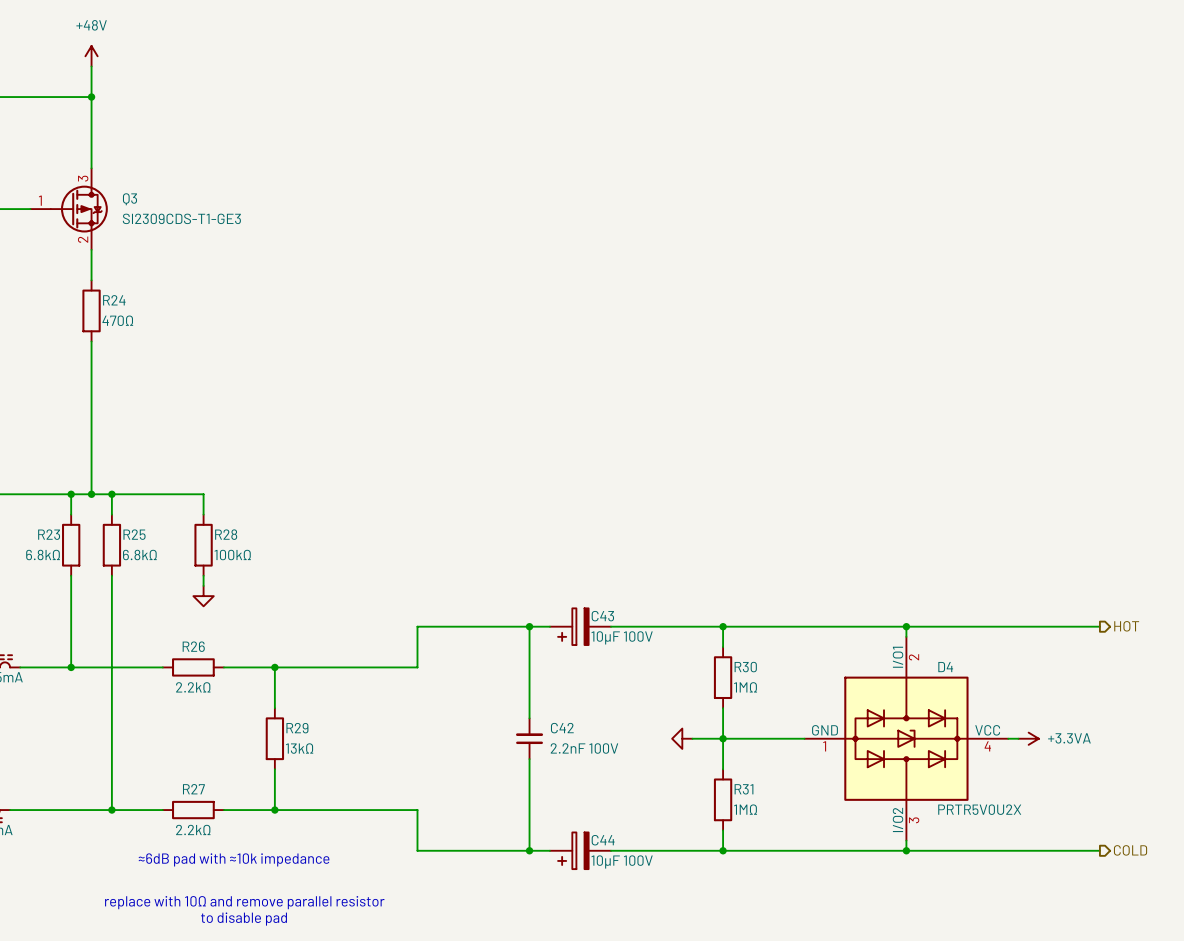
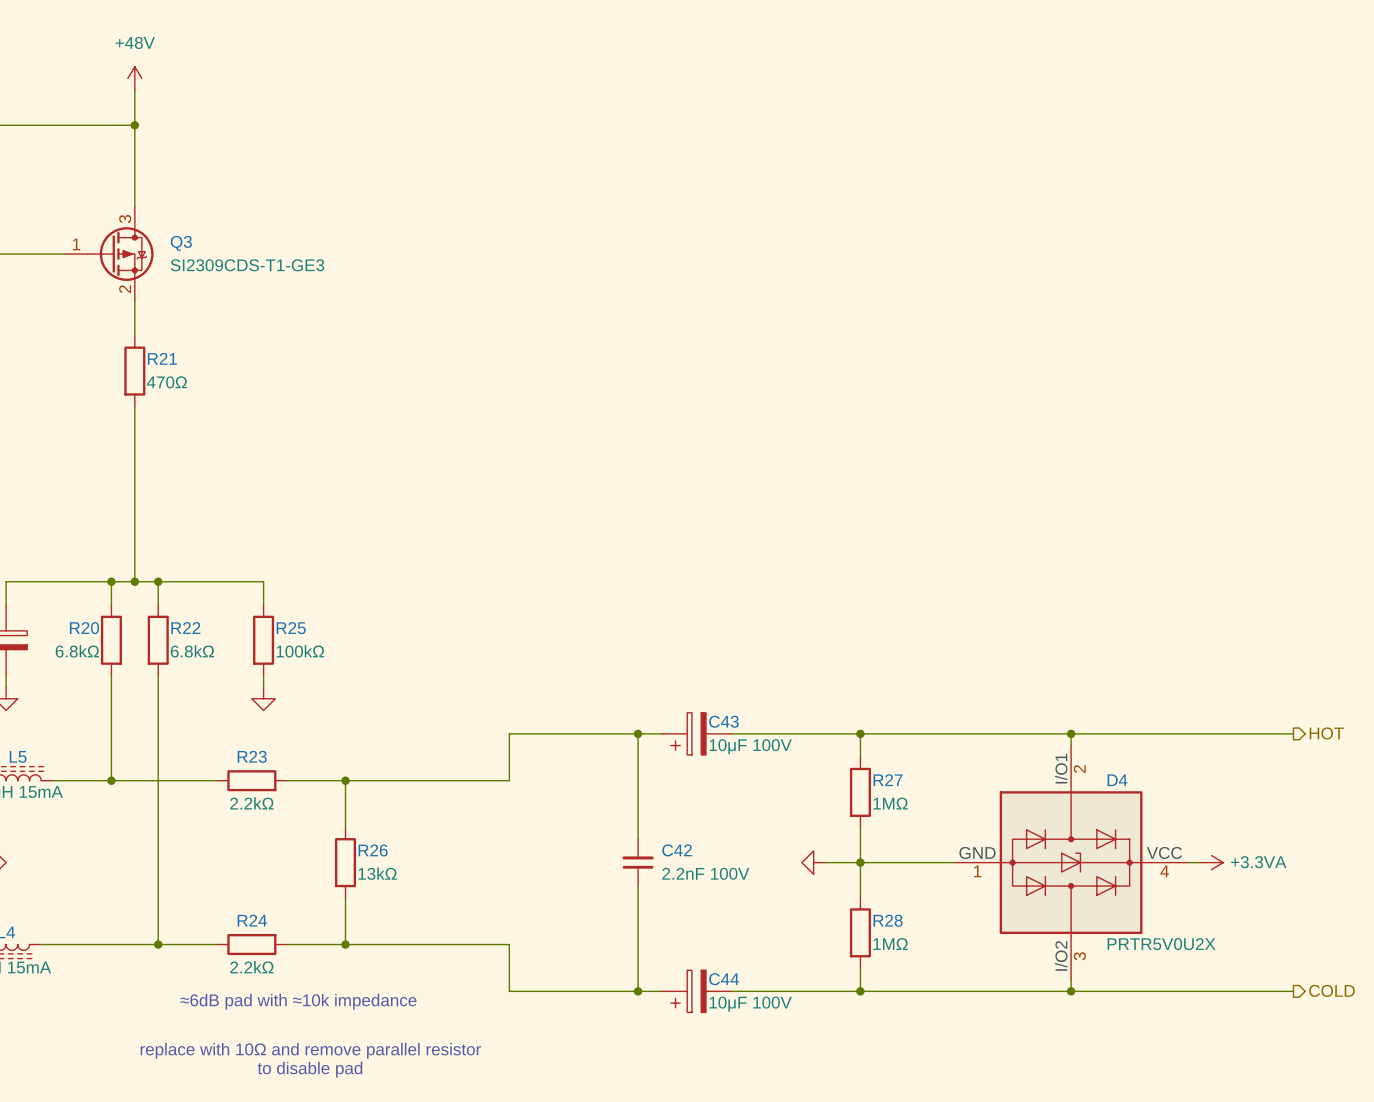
R24 name: R24 (114, 300) -> R21 (162, 358)
R23 name: R23 (49, 534) -> R20 (84, 628)
R25 name: R25 (134, 534) -> R22 (185, 628)
R28 name: R28 (226, 534) -> R25 (291, 628)
R26 name: R26 (193, 646) -> R23 (252, 756)
R30 name: R30 (745, 667) -> R27 (888, 780)
R29 name: R29 (297, 728) -> R26 (373, 850)
R27 name: R27 (193, 789) -> R24 (252, 920)
R31 name: R31 (744, 789) -> R28 (888, 920)

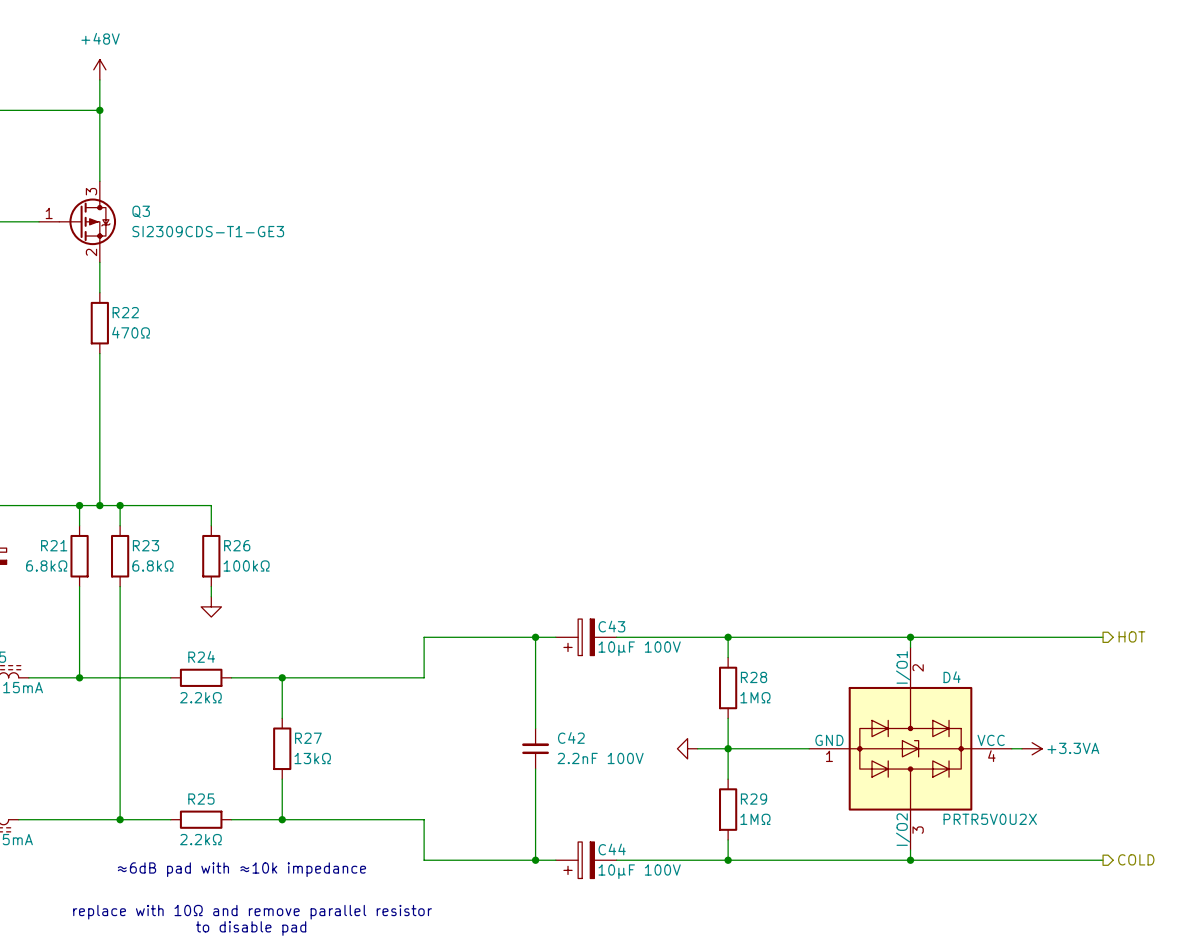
R21 name: R21 (162, 358) -> R22 (125, 312)
R20 name: R20 (84, 628) -> R21 (54, 545)
R22 name: R22 (185, 628) -> R23 (145, 545)
R25 name: R25 (291, 628) -> R26 (237, 545)
R23 name: R23 (252, 756) -> R24 (201, 656)
R27 name: R27 (888, 780) -> R28 (754, 677)
R26 name: R26 (373, 850) -> R27 (308, 738)
R24 name: R24 (252, 920) -> R25 (201, 799)
R28 name: R28 (888, 920) -> R29 (754, 799)

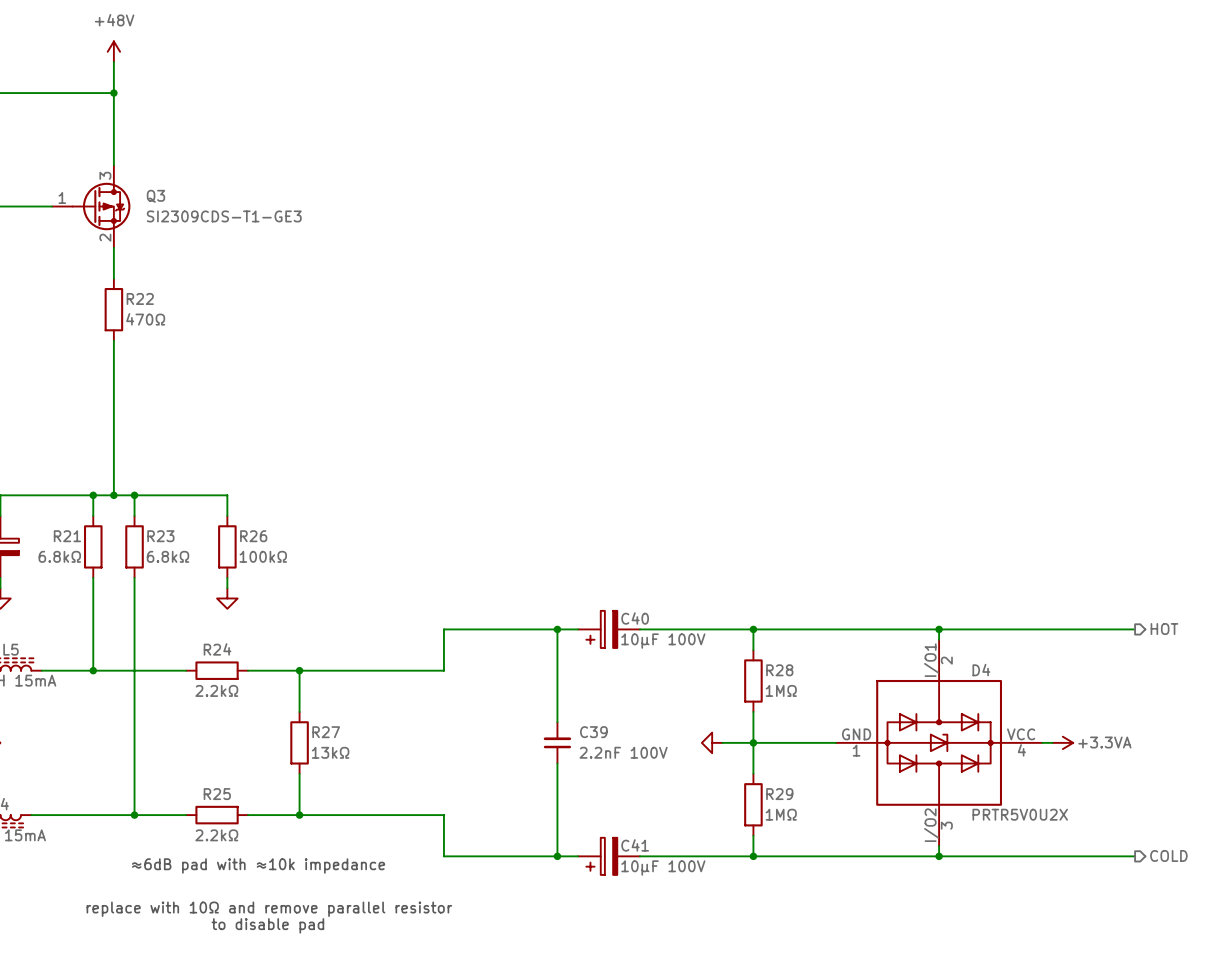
C43 name: C43 (611, 626) -> C40 (635, 618)
C42 name: C42 (571, 737) -> C39 (593, 732)
C44 name: C44 (612, 849) -> C41 (635, 845)

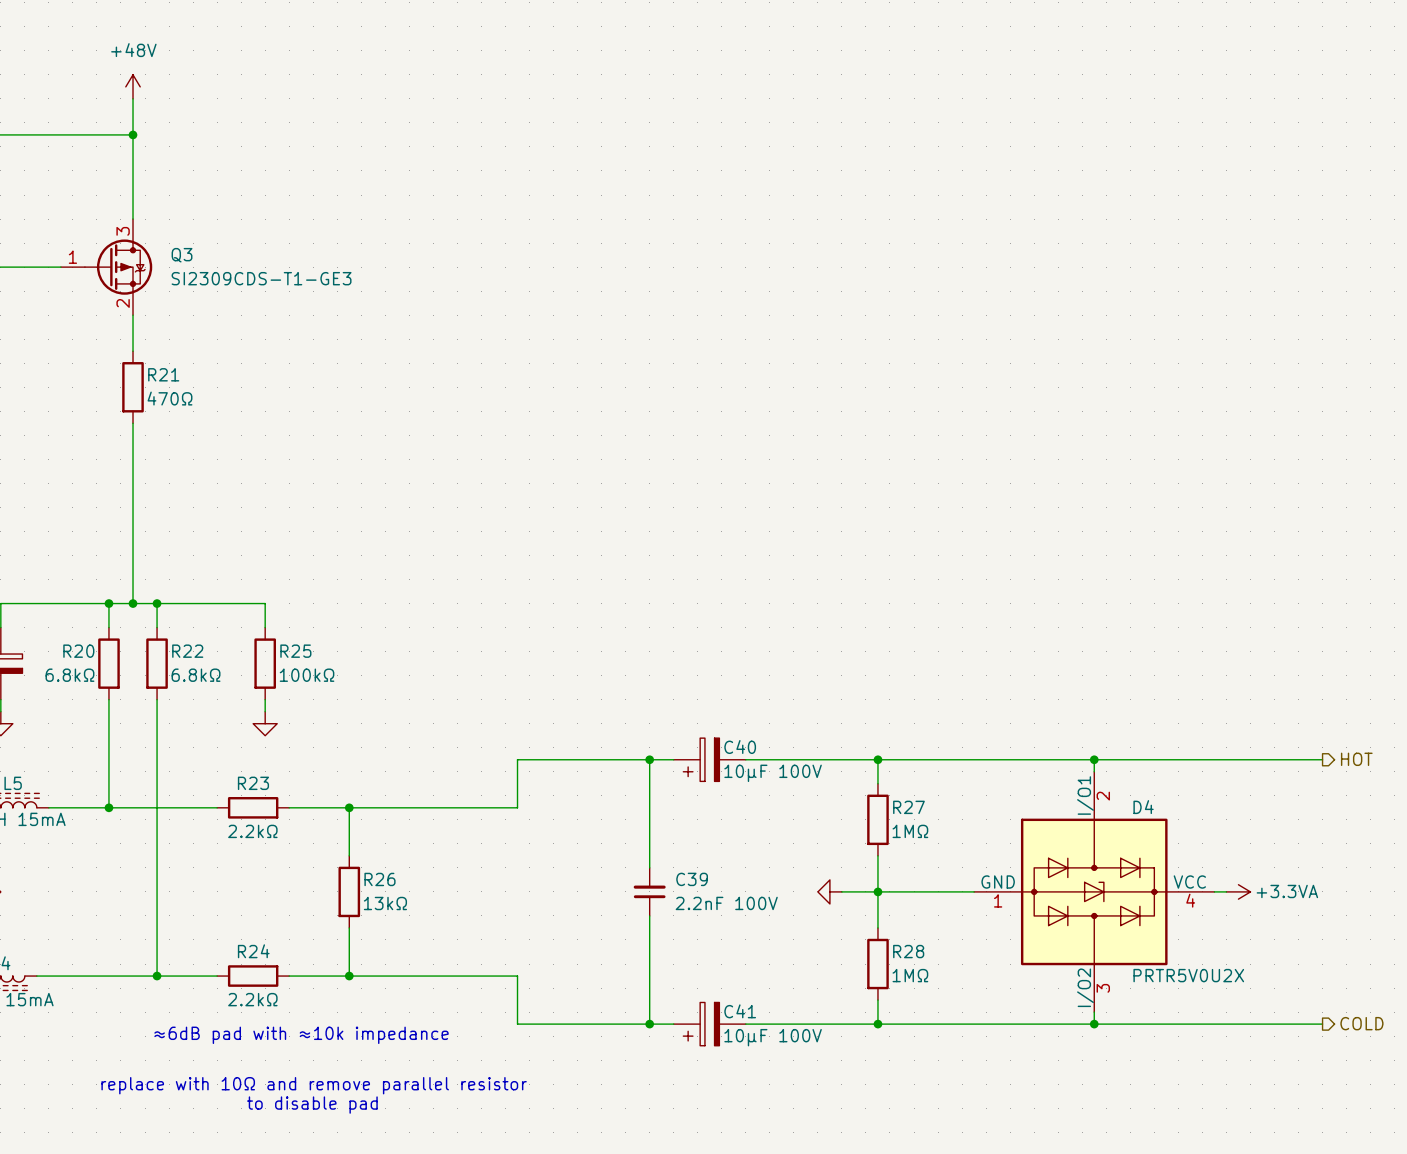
R22 name: R22 (140, 298) -> R21 (163, 374)
R21 name: R21 (67, 536) -> R20 (78, 651)
R23 name: R23 (160, 536) -> R22 (187, 651)
R26 name: R26 (253, 536) -> R25 (295, 651)
R24 name: R24 (217, 649) -> R23 (253, 783)
R28 name: R28 (779, 670) -> R27 (908, 807)
R27 name: R27 (326, 732) -> R26 (379, 879)
R25 name: R25 (217, 794) -> R24 (253, 951)
R29 name: R29 (779, 794) -> R28 (908, 951)

